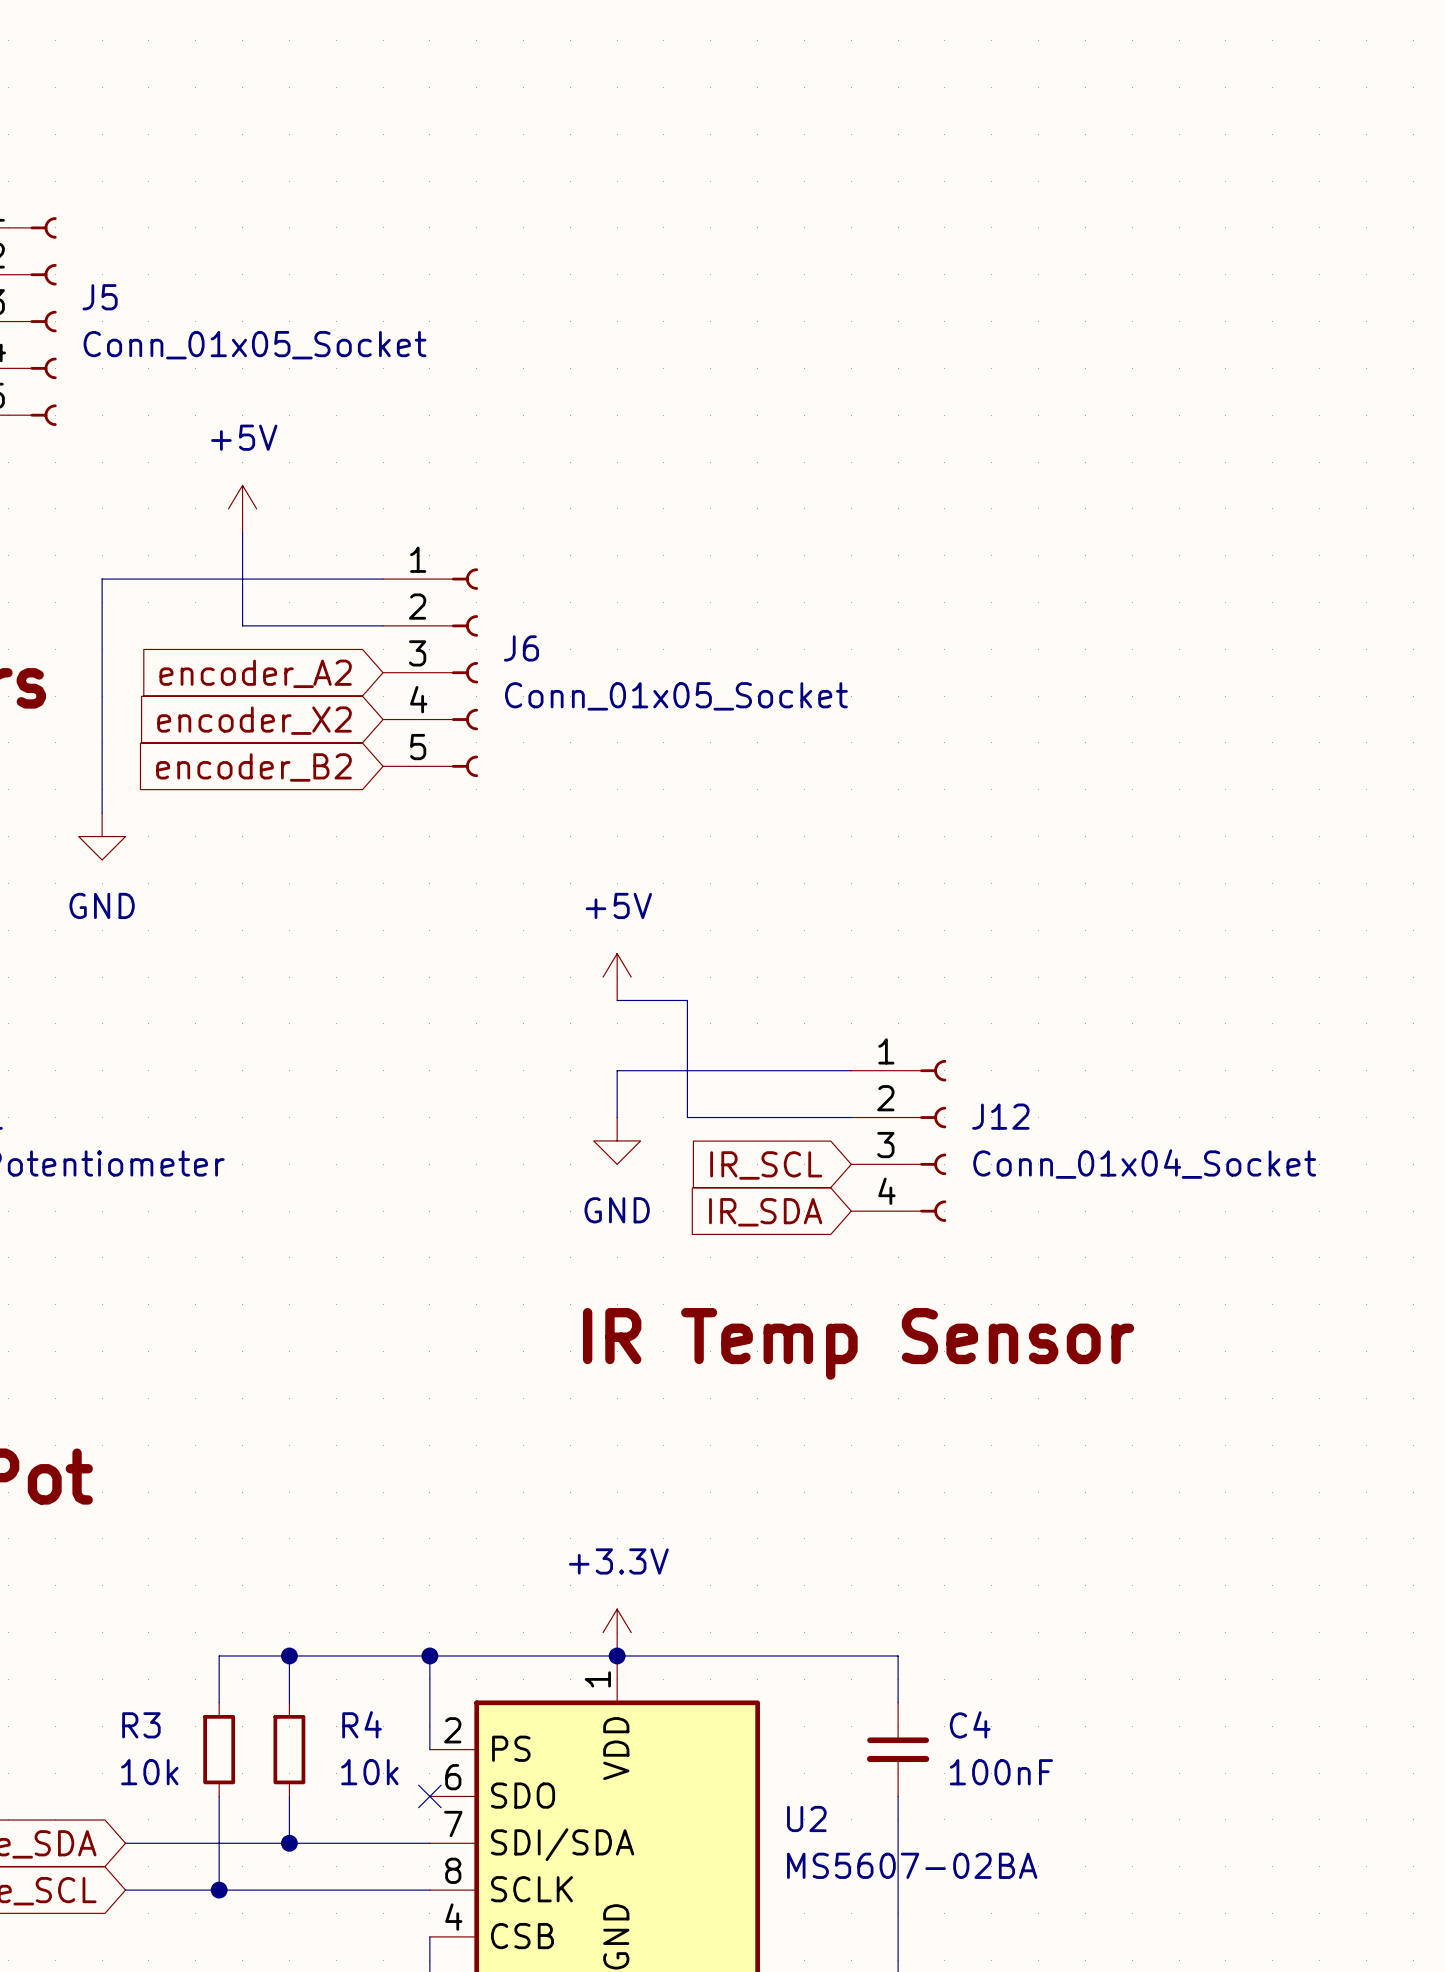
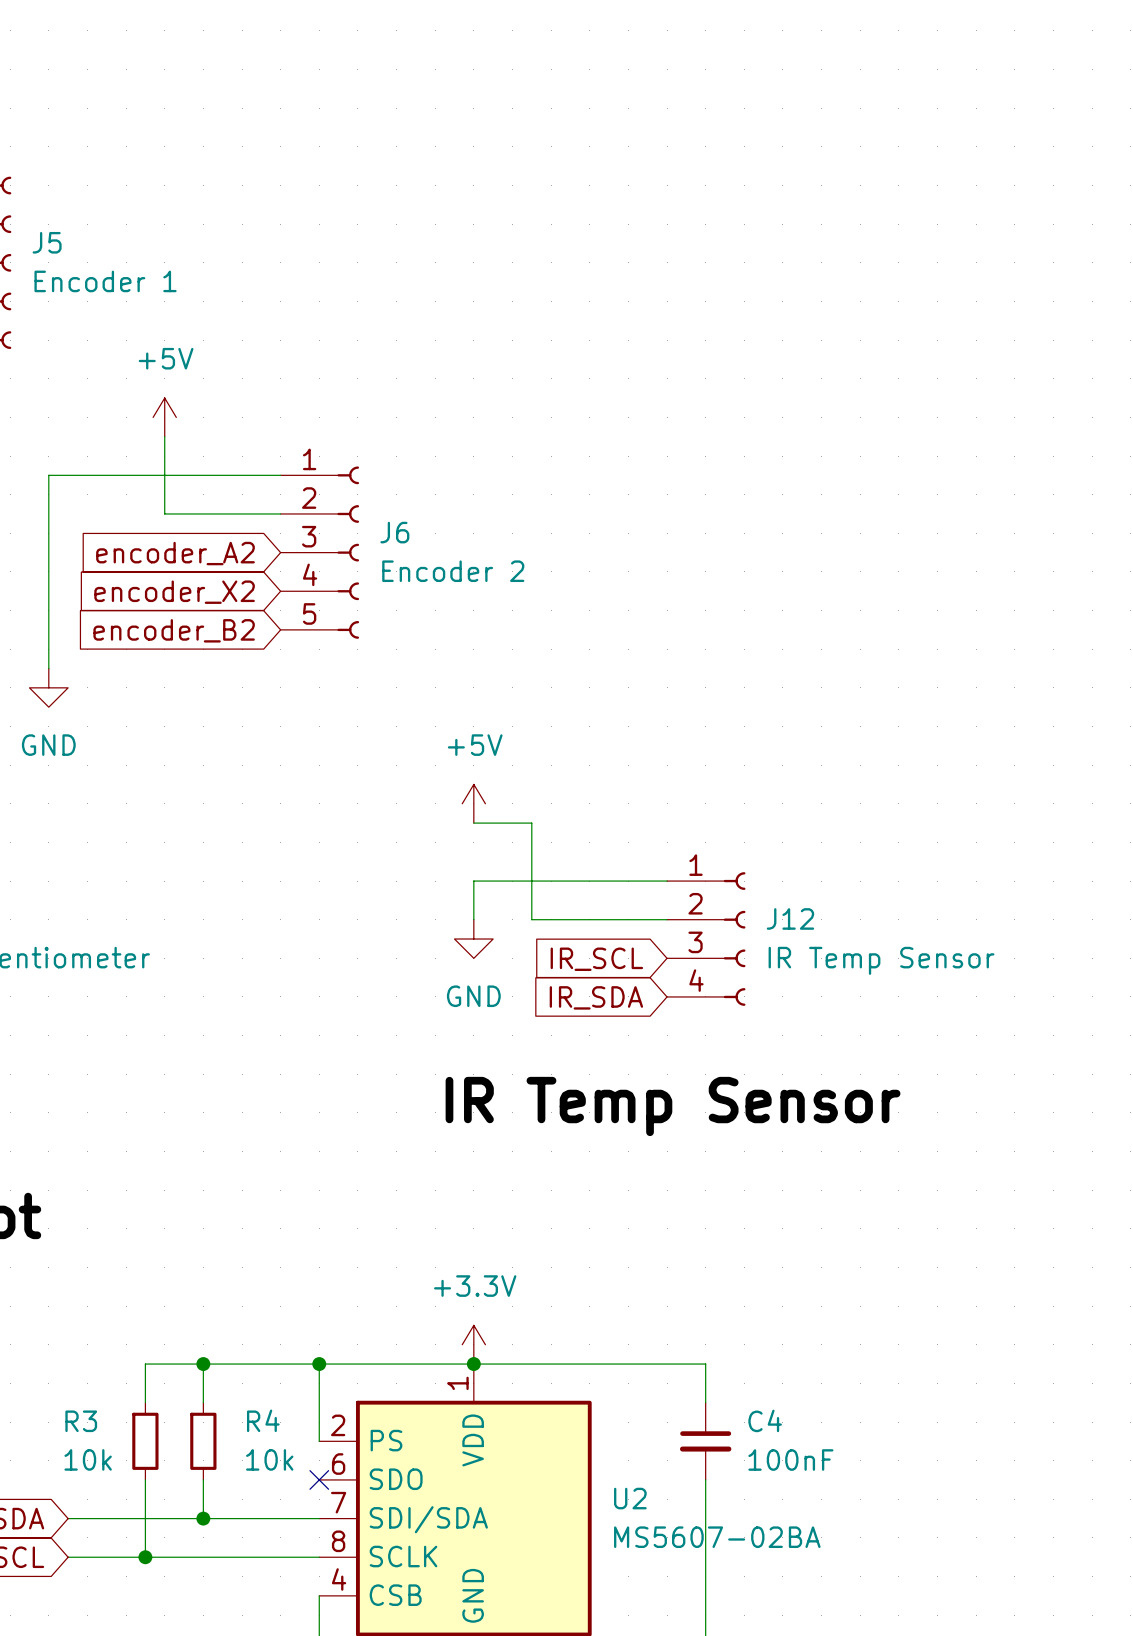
J5 value: Conn_01x05_Socket (255, 345) -> Encoder 1 (105, 281)
J6 value: Conn_01x05_Socket (676, 696) -> Encoder 2 (453, 571)
J12 value: Conn_01x04_Socket (1144, 1164) -> IR Temp Sensor (881, 960)

